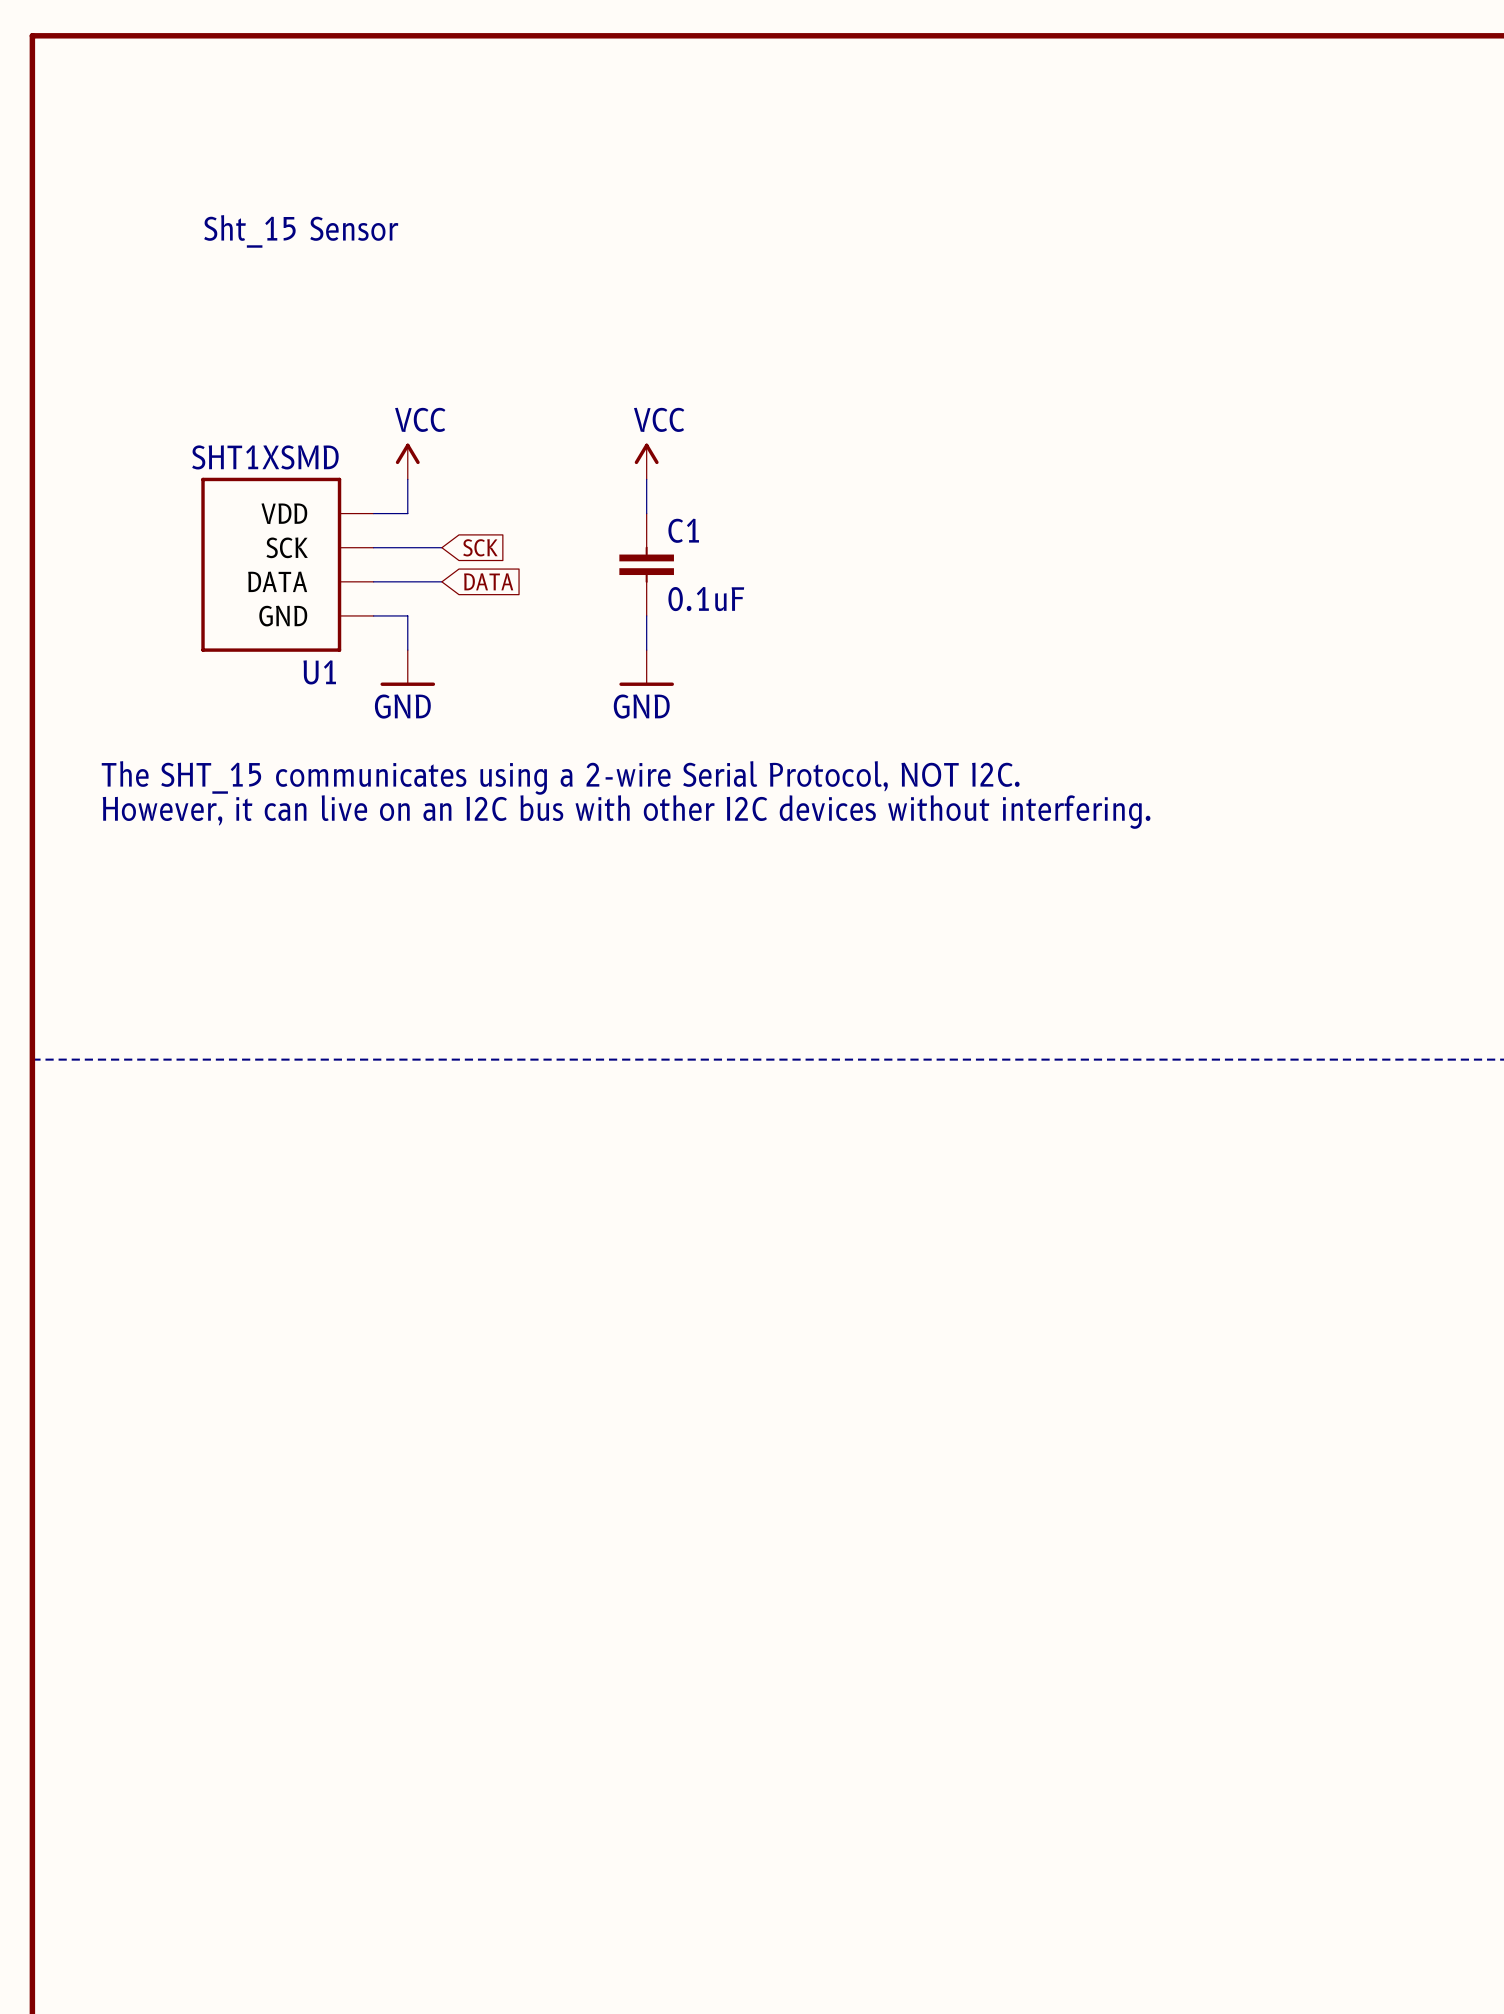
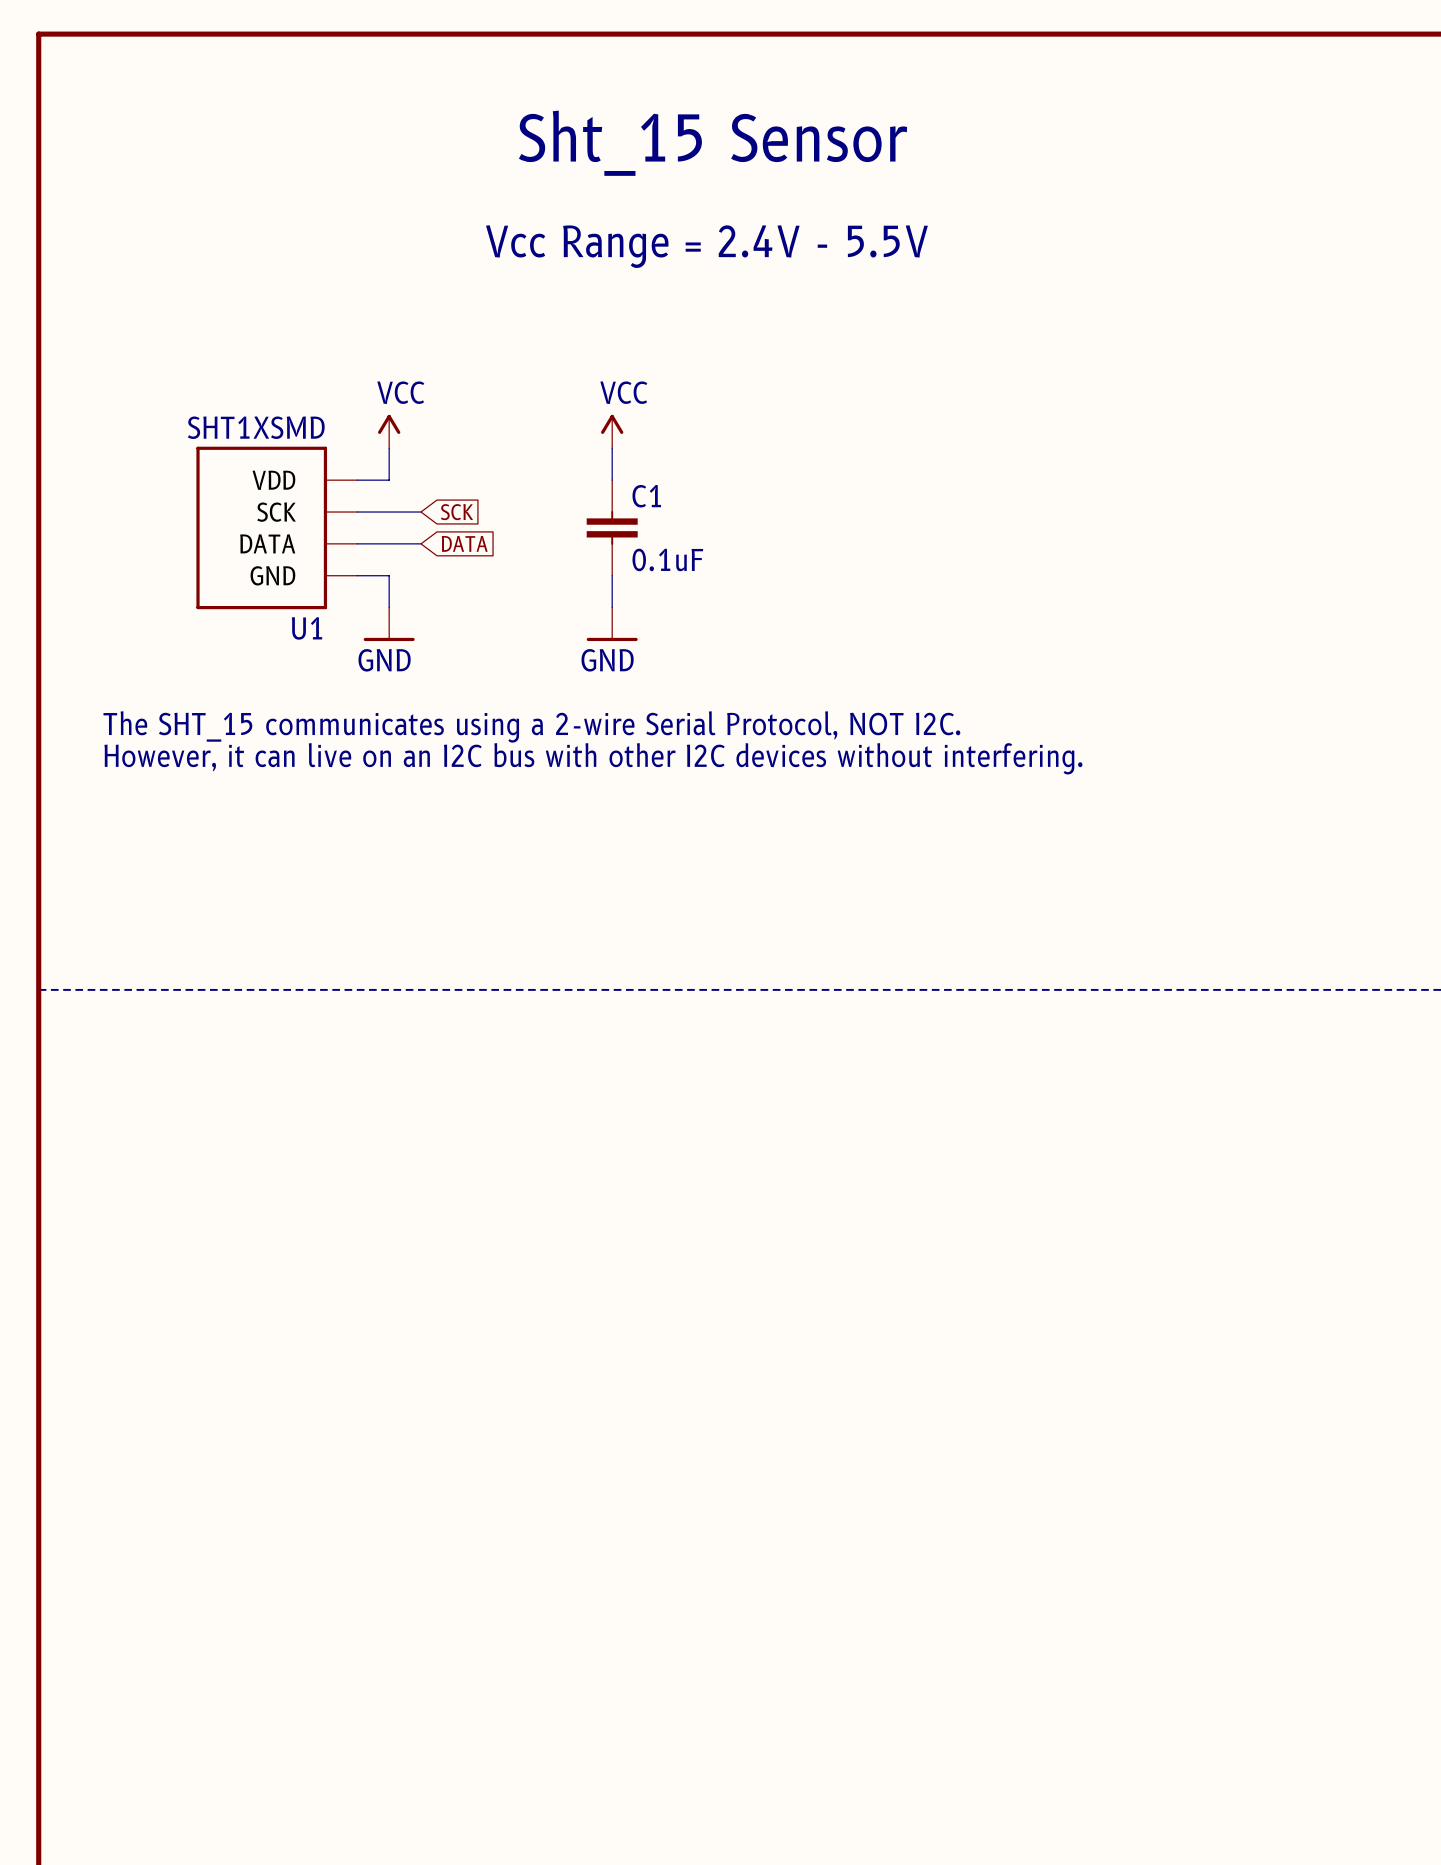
text: none -> Sht_15 Sensor (713, 143)
text: Sht_15 Sensor (301, 231) -> none
text: none -> Vcc Range = 2.4V - 5.5V (706, 246)

